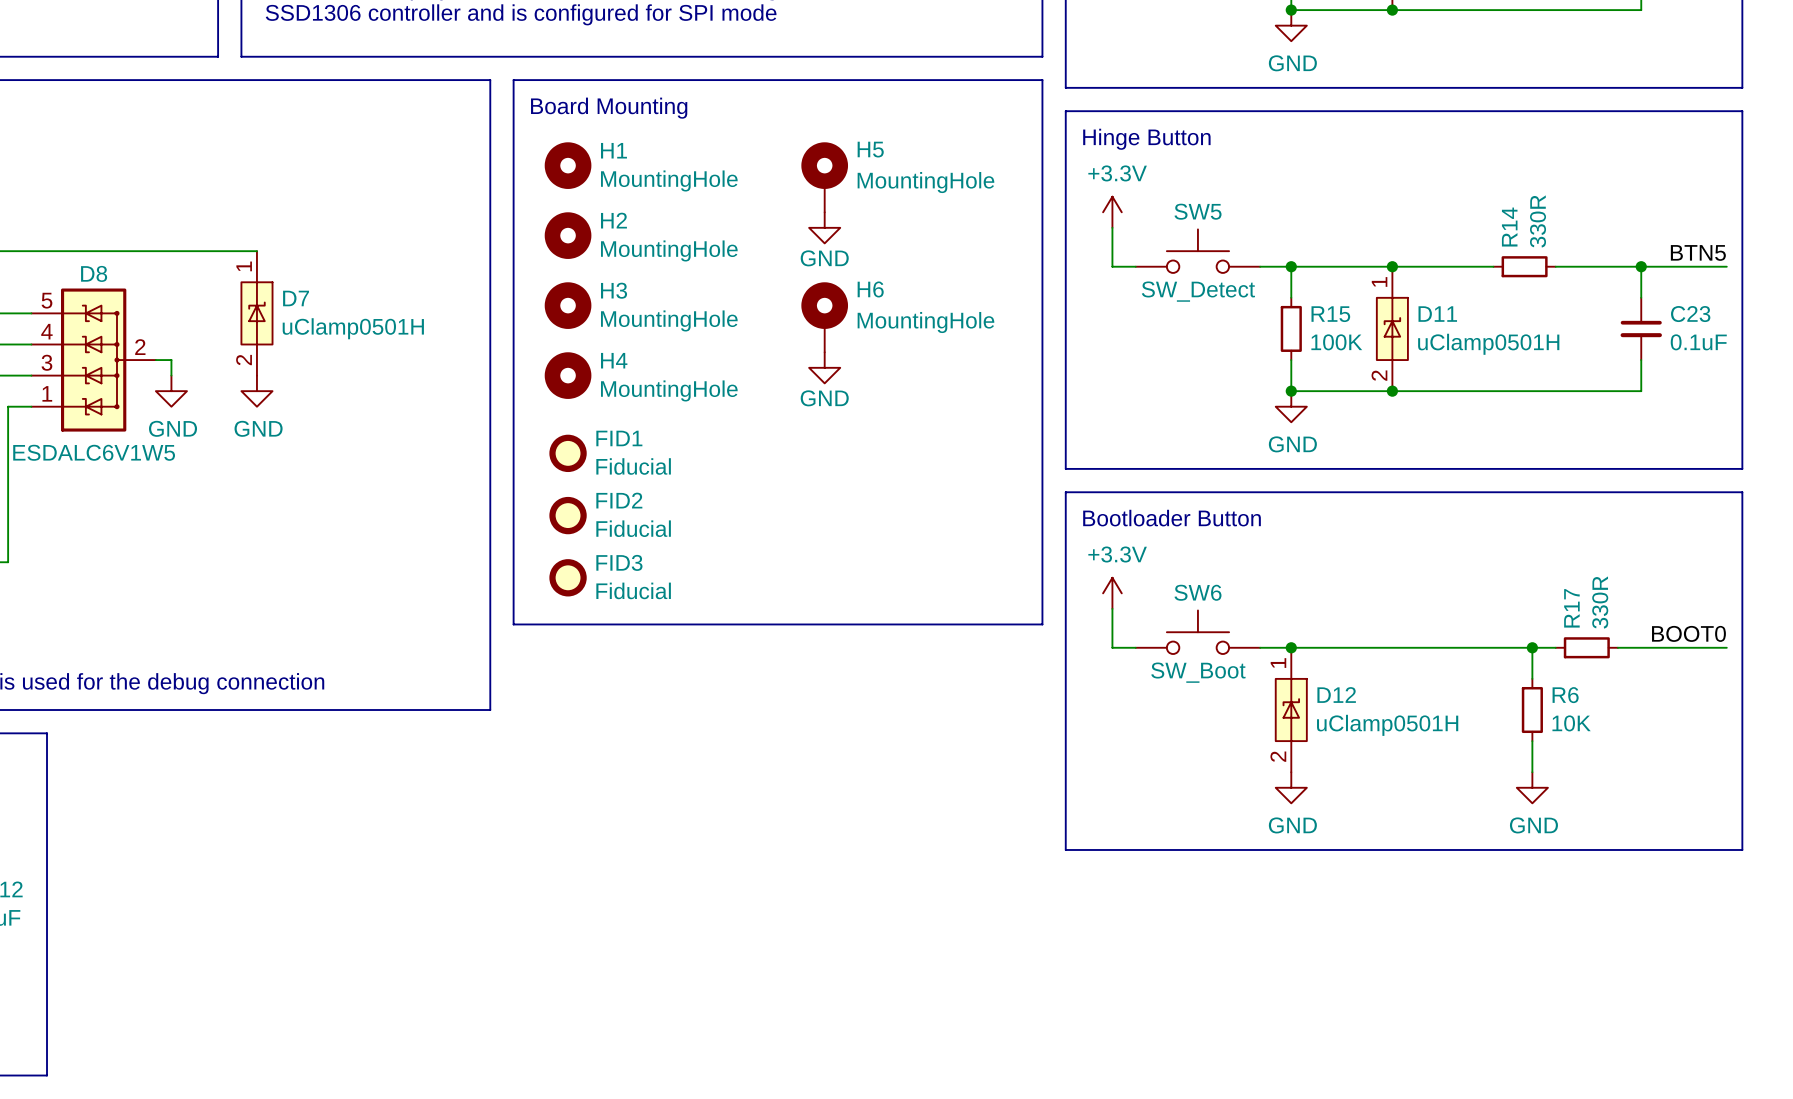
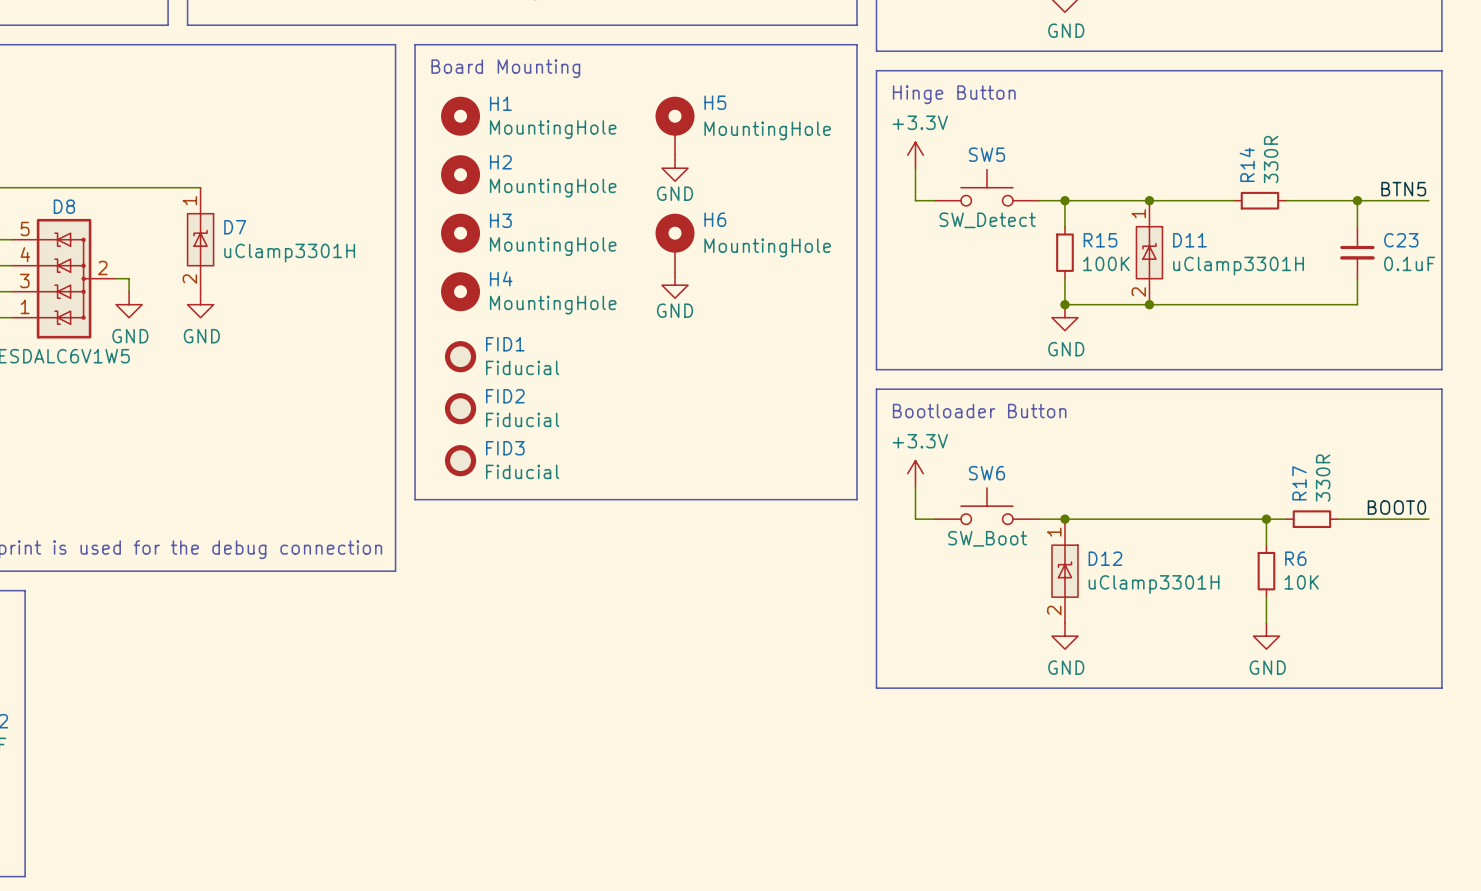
D7 value: uClamp0501H (353, 328) -> uClamp3301H (289, 253)
D11 value: uClamp0501H (1488, 344) -> uClamp3301H (1238, 266)
D12 value: uClamp0501H (1387, 725) -> uClamp3301H (1154, 584)

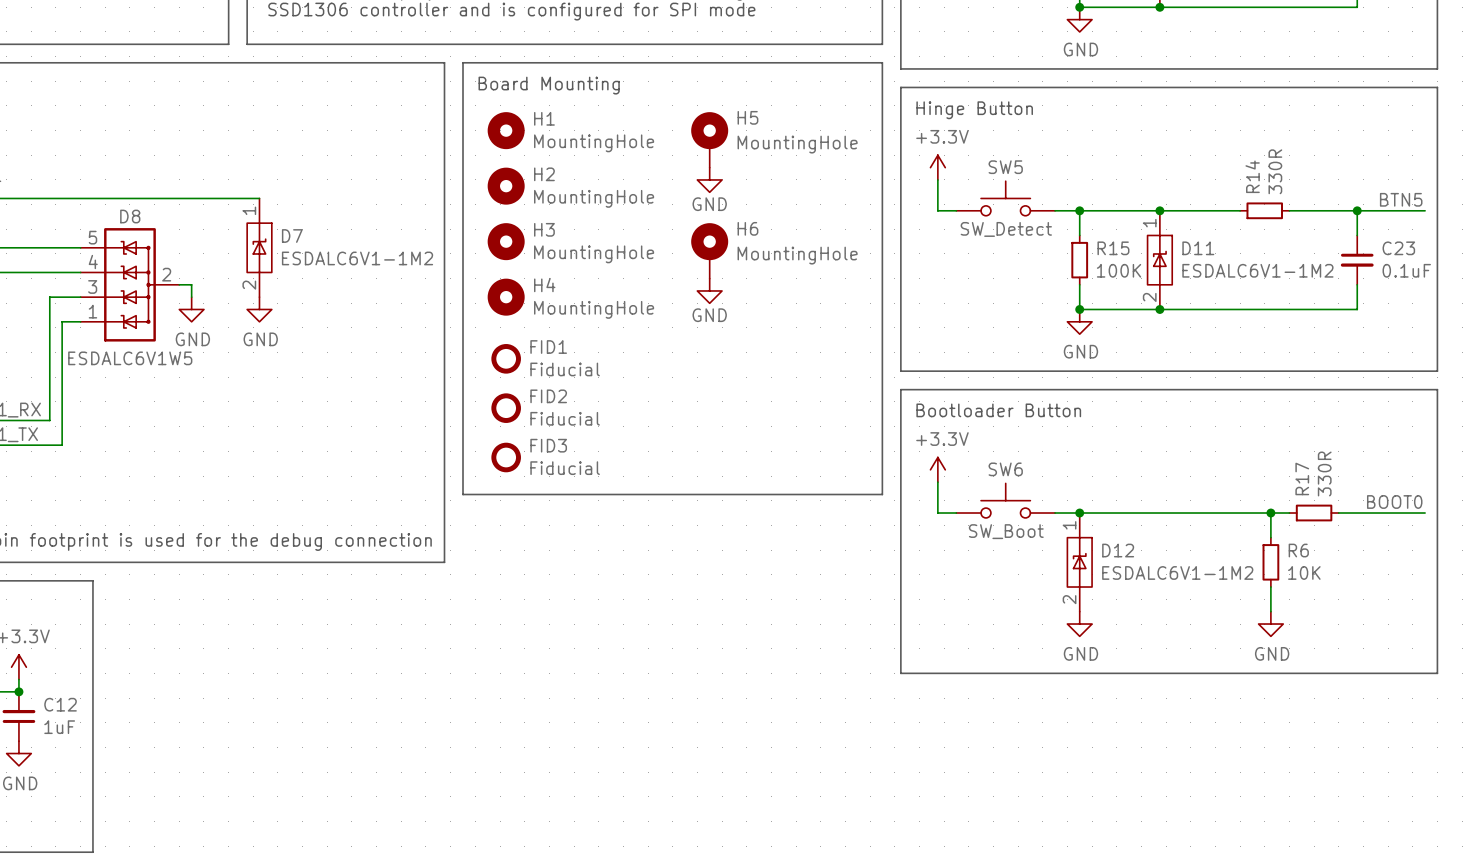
D7 value: uClamp3301H (289, 253) -> ESDALC6V1-1M2 (357, 258)
D11 value: uClamp3301H (1238, 266) -> ESDALC6V1-1M2 (1257, 270)
D12 value: uClamp3301H (1154, 584) -> ESDALC6V1-1M2 (1177, 572)

